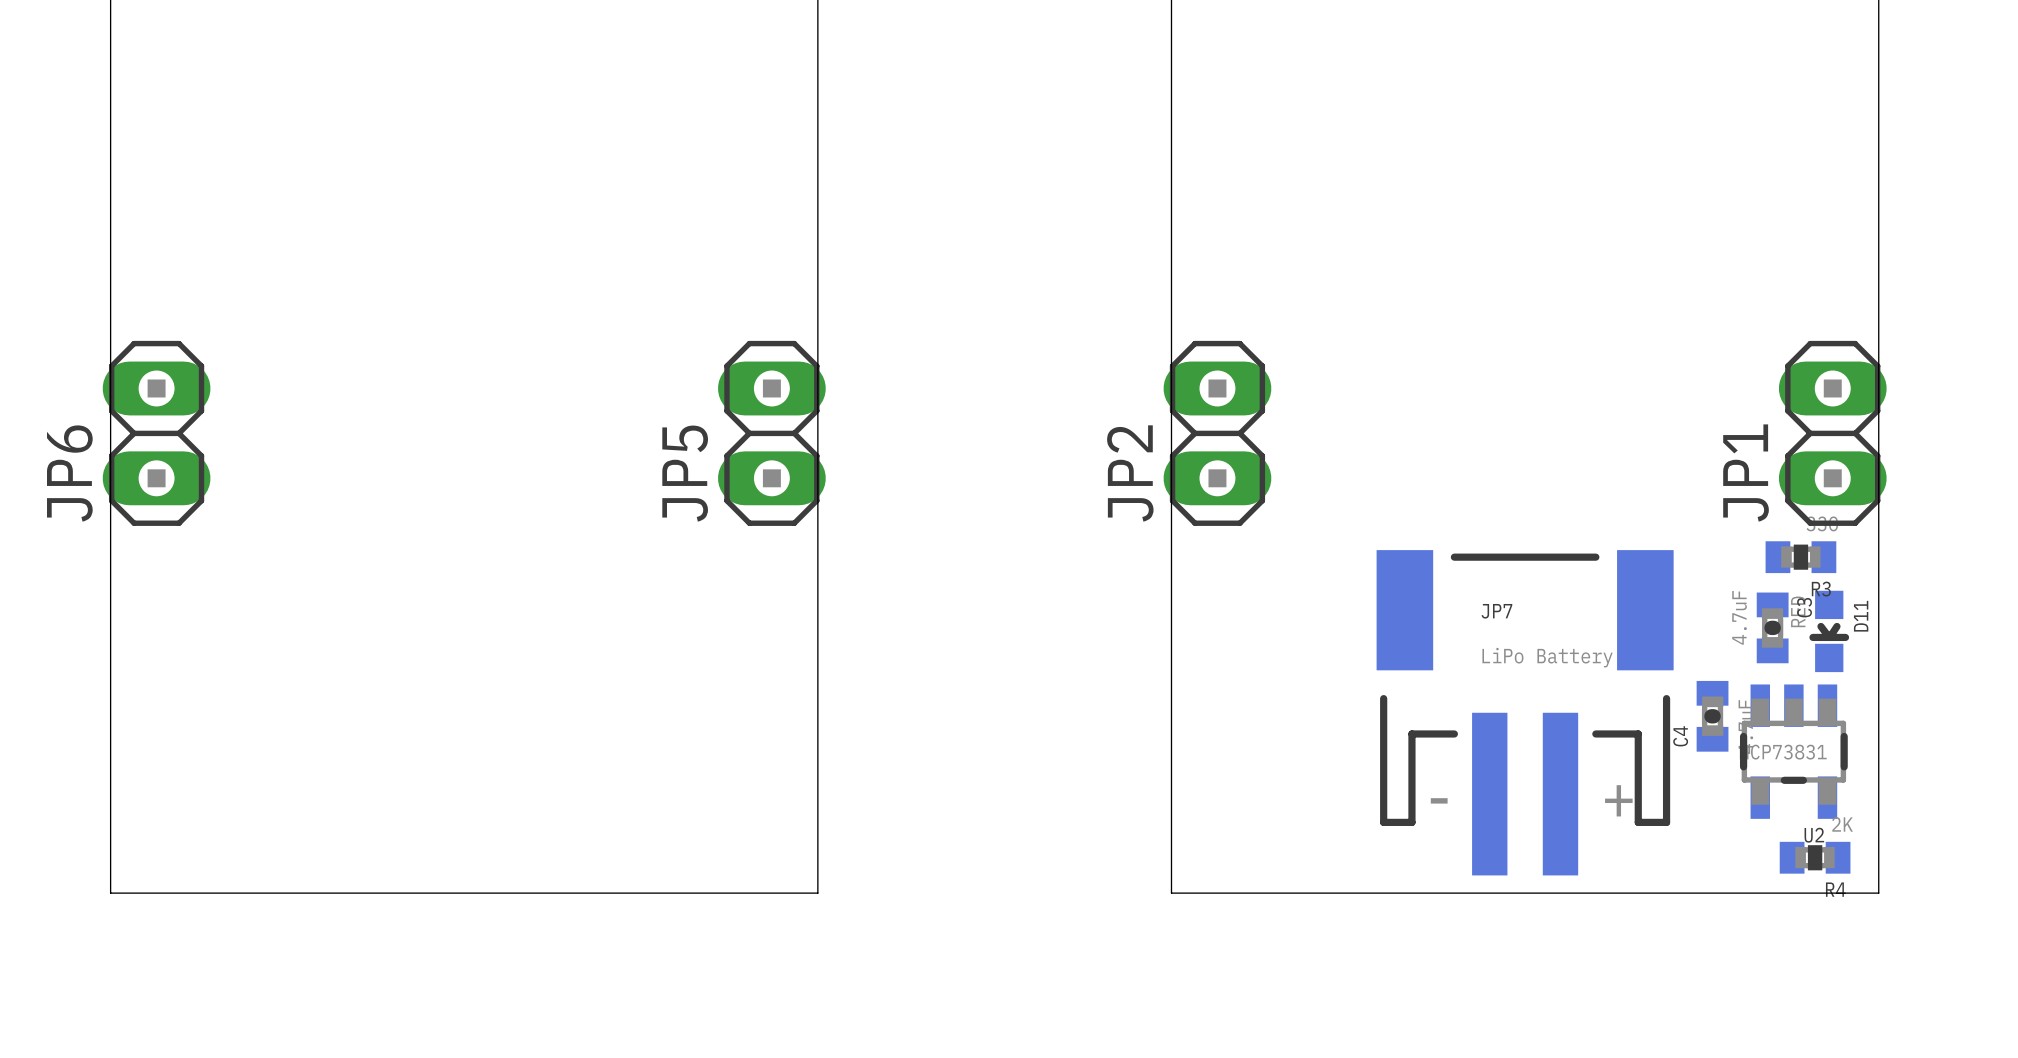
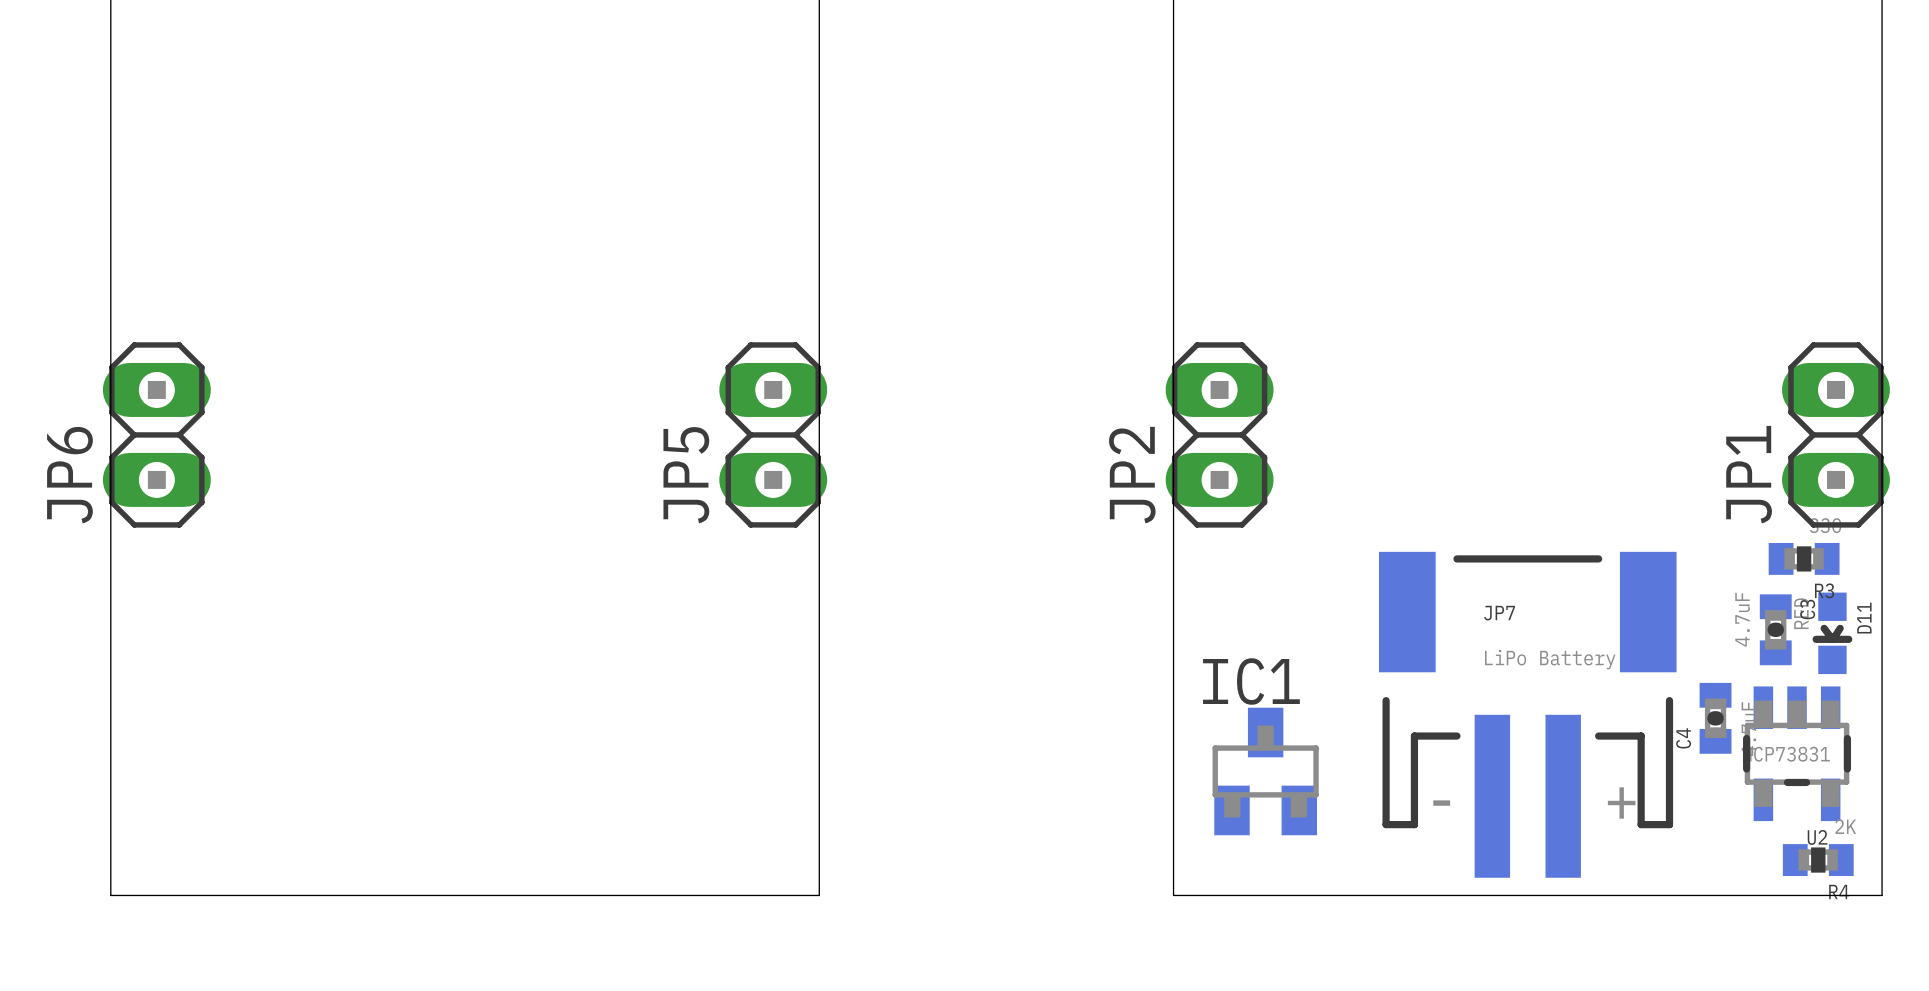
IC1: none -> (1265, 771)

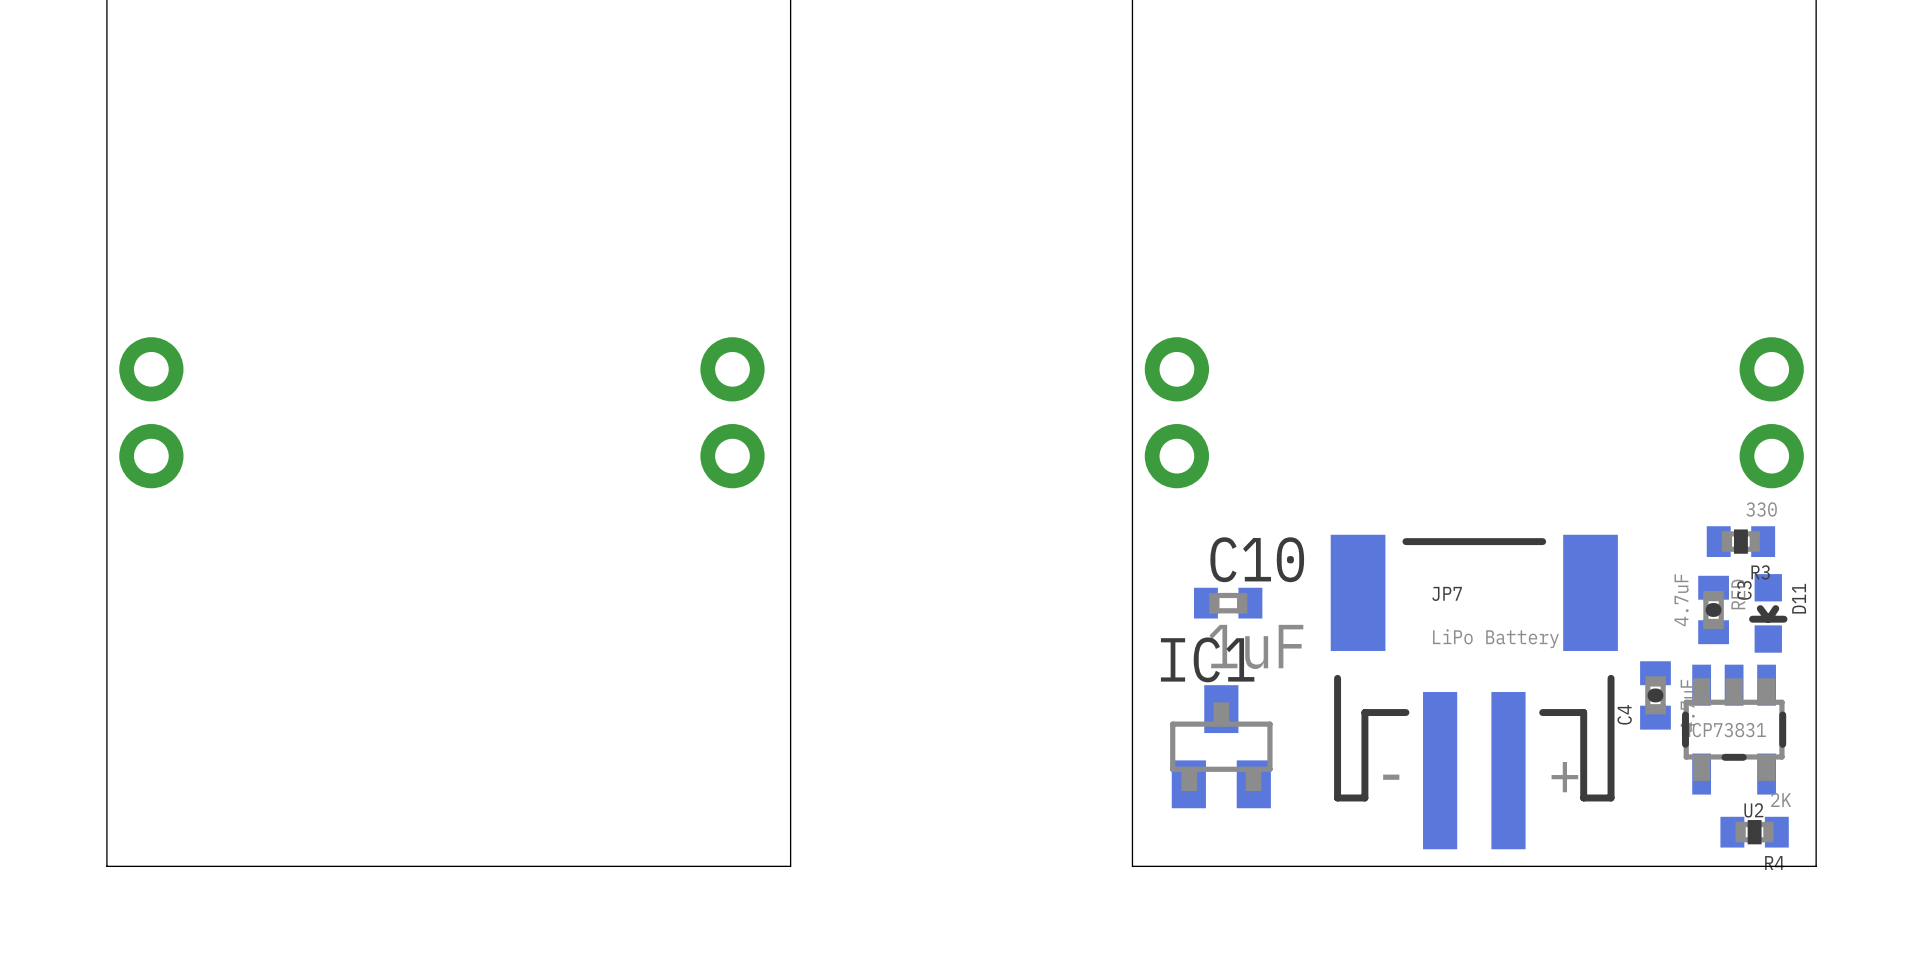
part: none -> (151, 412)
part: none -> (732, 412)
part: none -> (1176, 412)
part: none -> (1771, 412)
JP6: (156, 434) -> none
JP5: (773, 434) -> none
JP2: (1219, 434) -> none
JP1: (1835, 434) -> none
C10: none -> 1uF (1228, 603)

